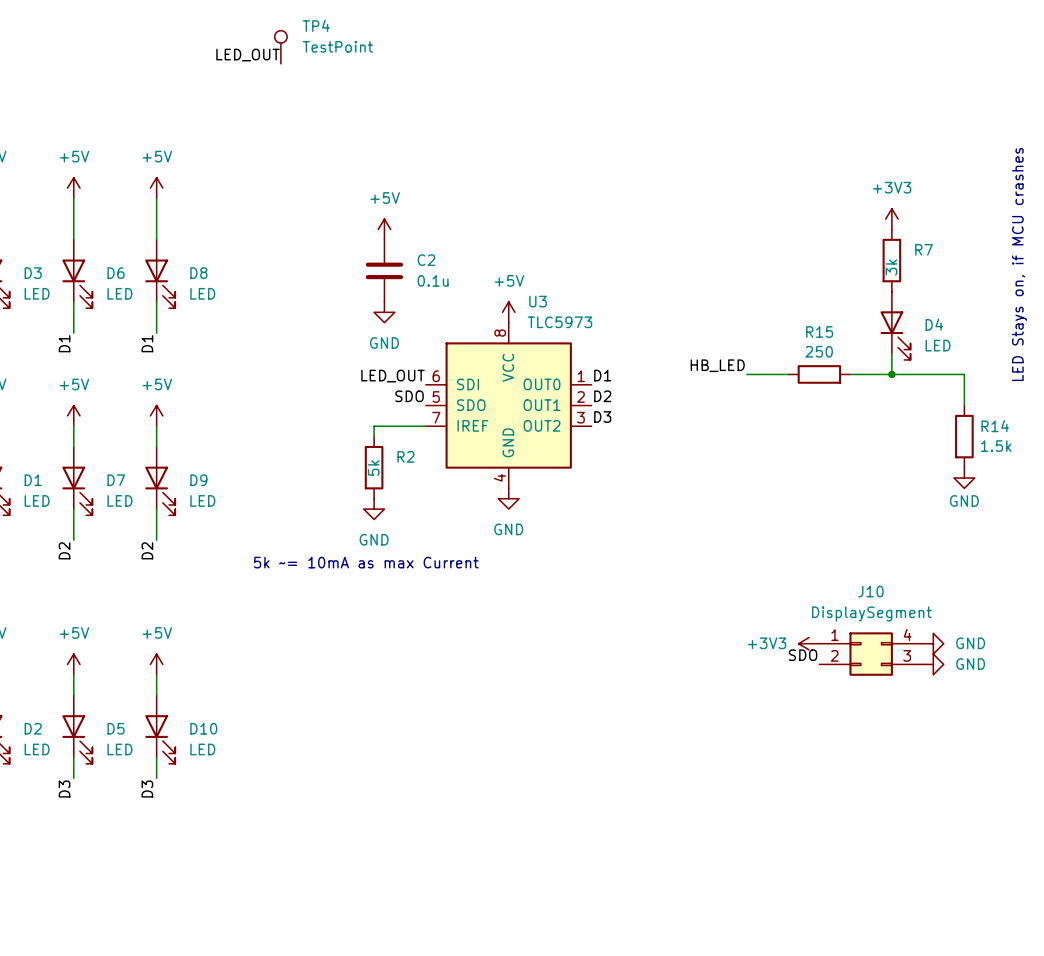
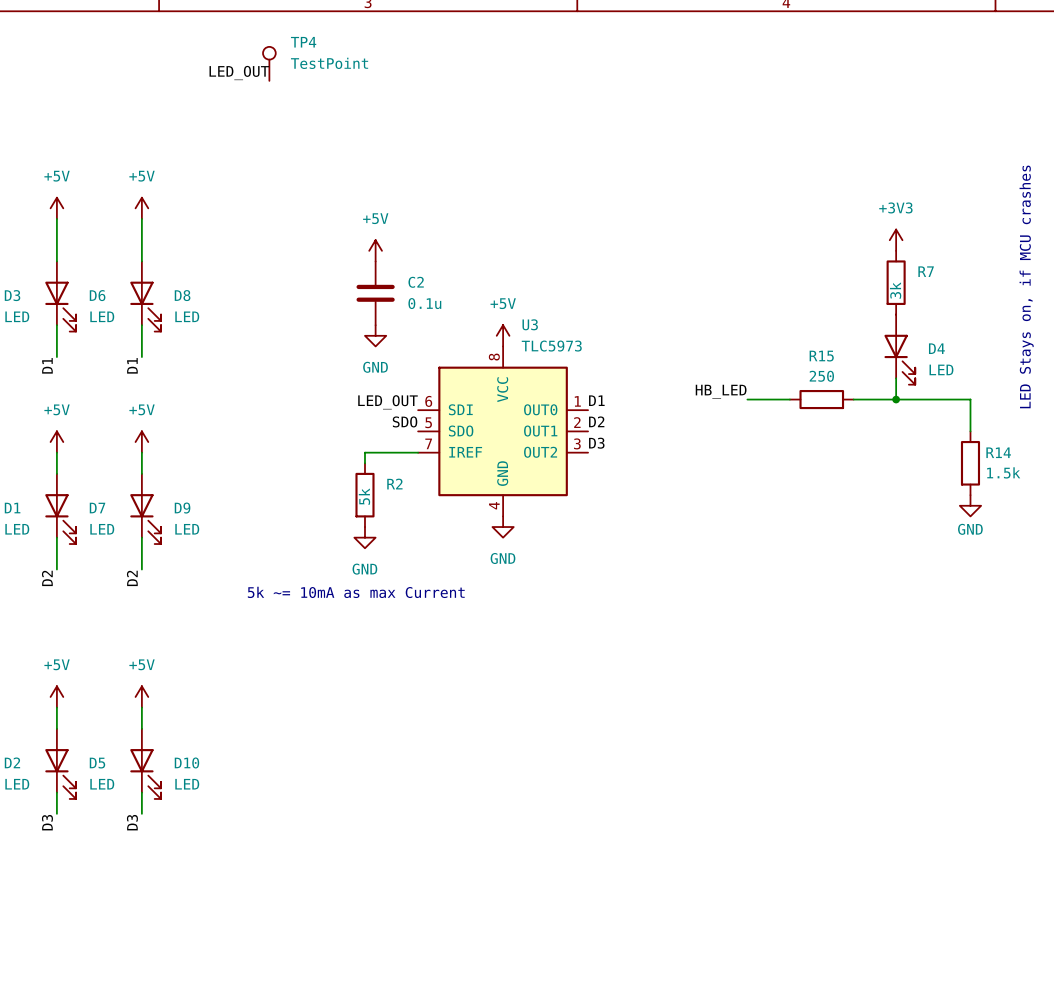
power symbol: +3V3 (809, 643) -> none
power symbol: GND (933, 643) -> none
J10: DisplaySegment (871, 654) -> none
label: SDO (803, 655) -> none
power symbol: GND (933, 664) -> none

